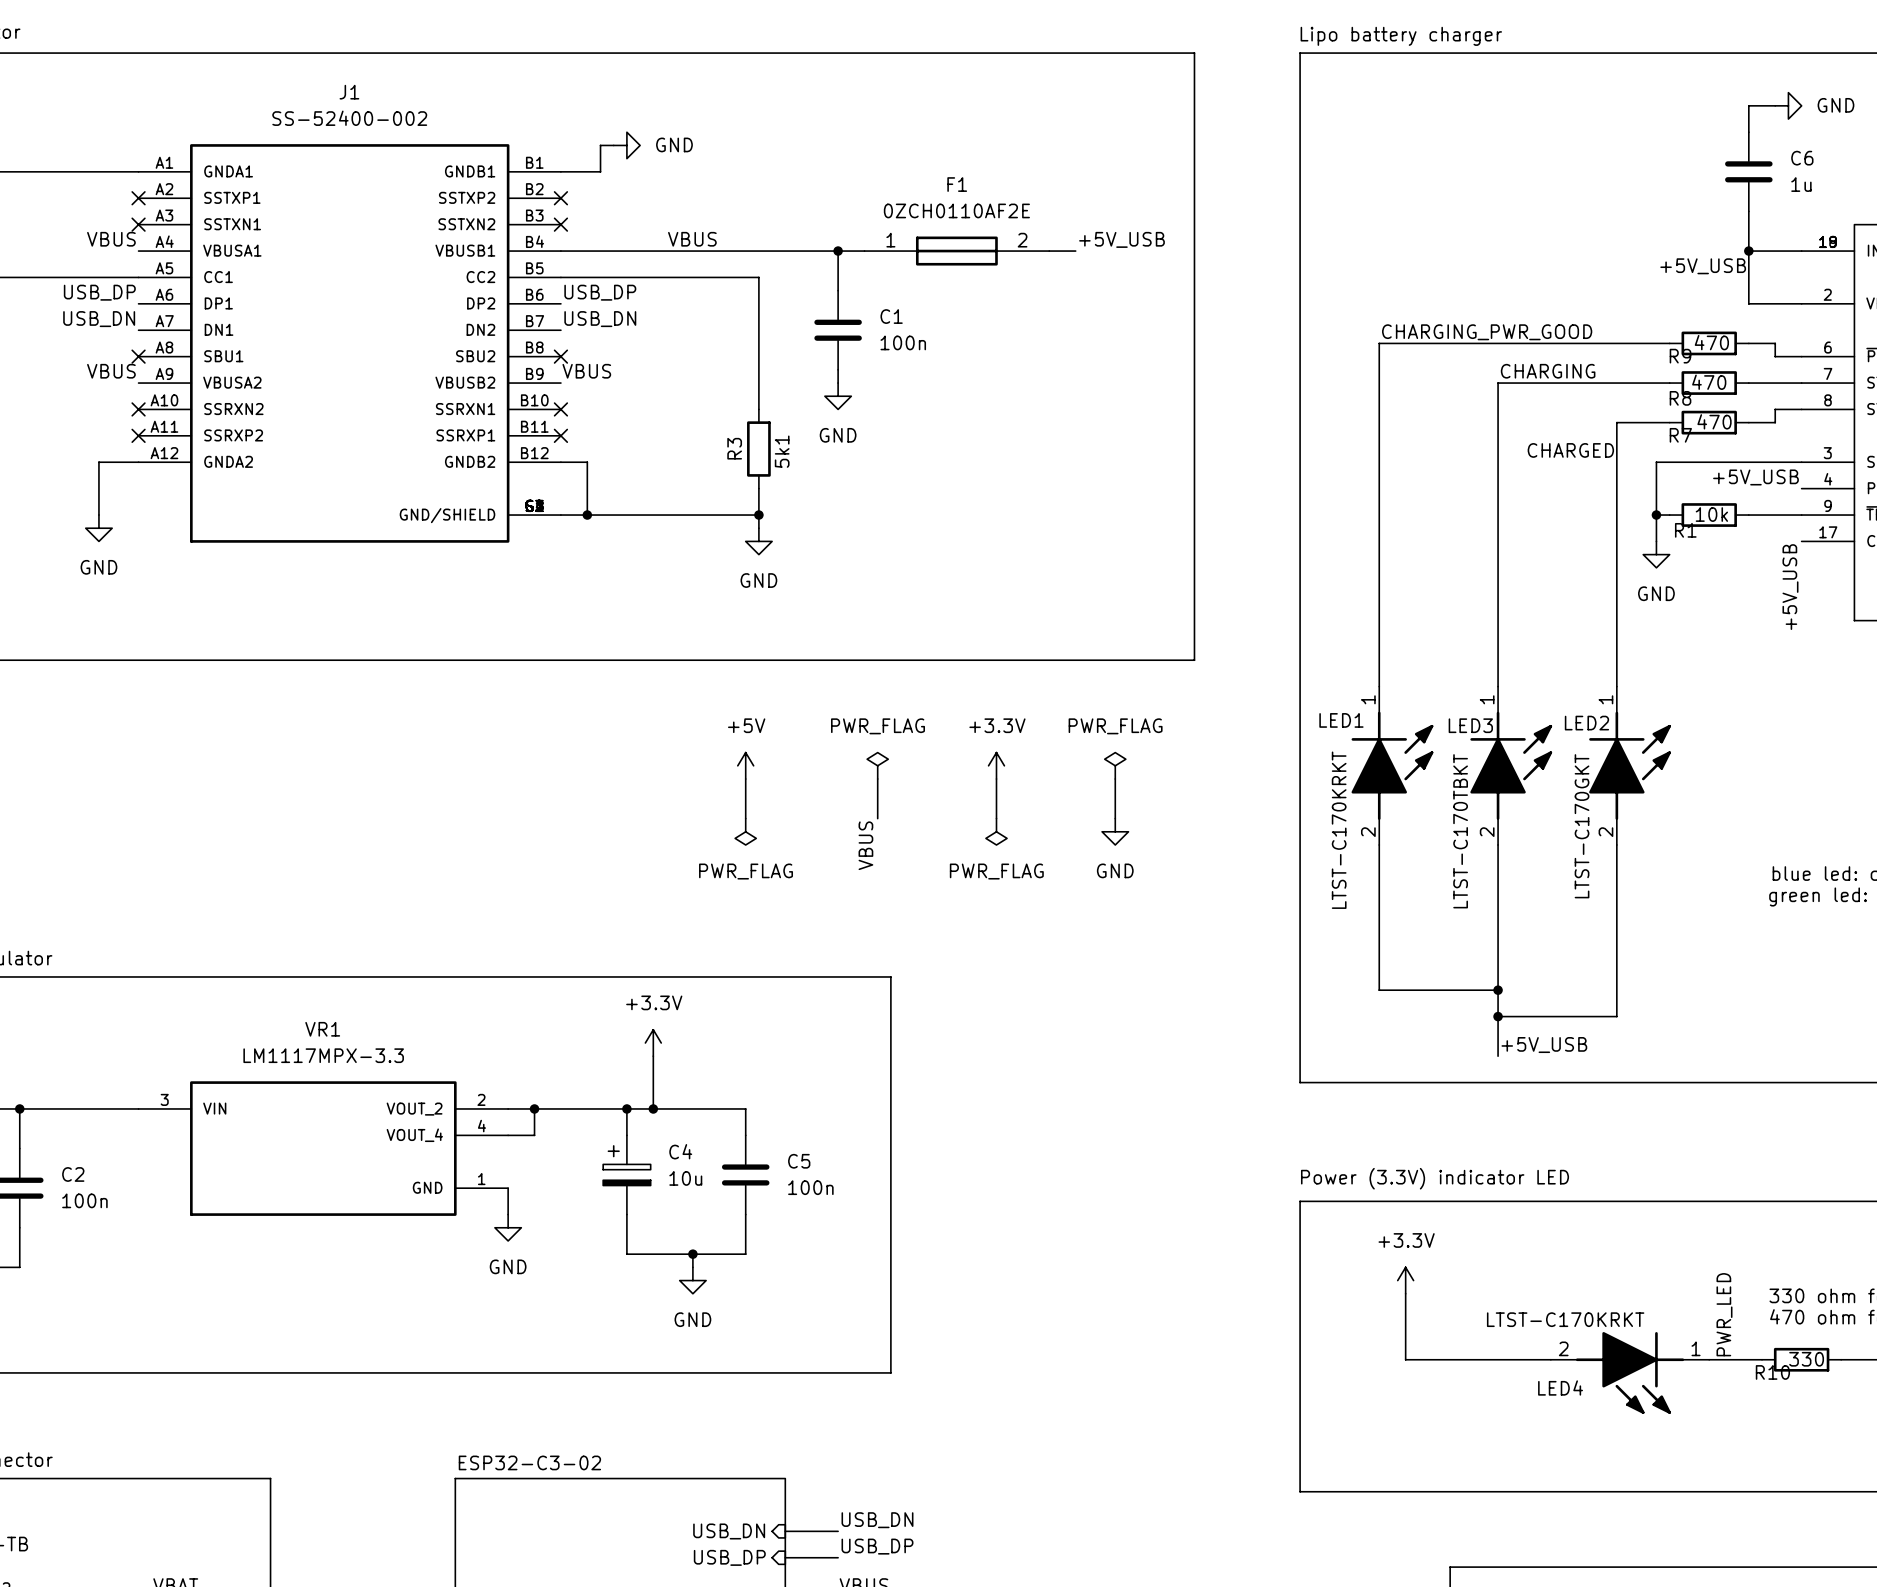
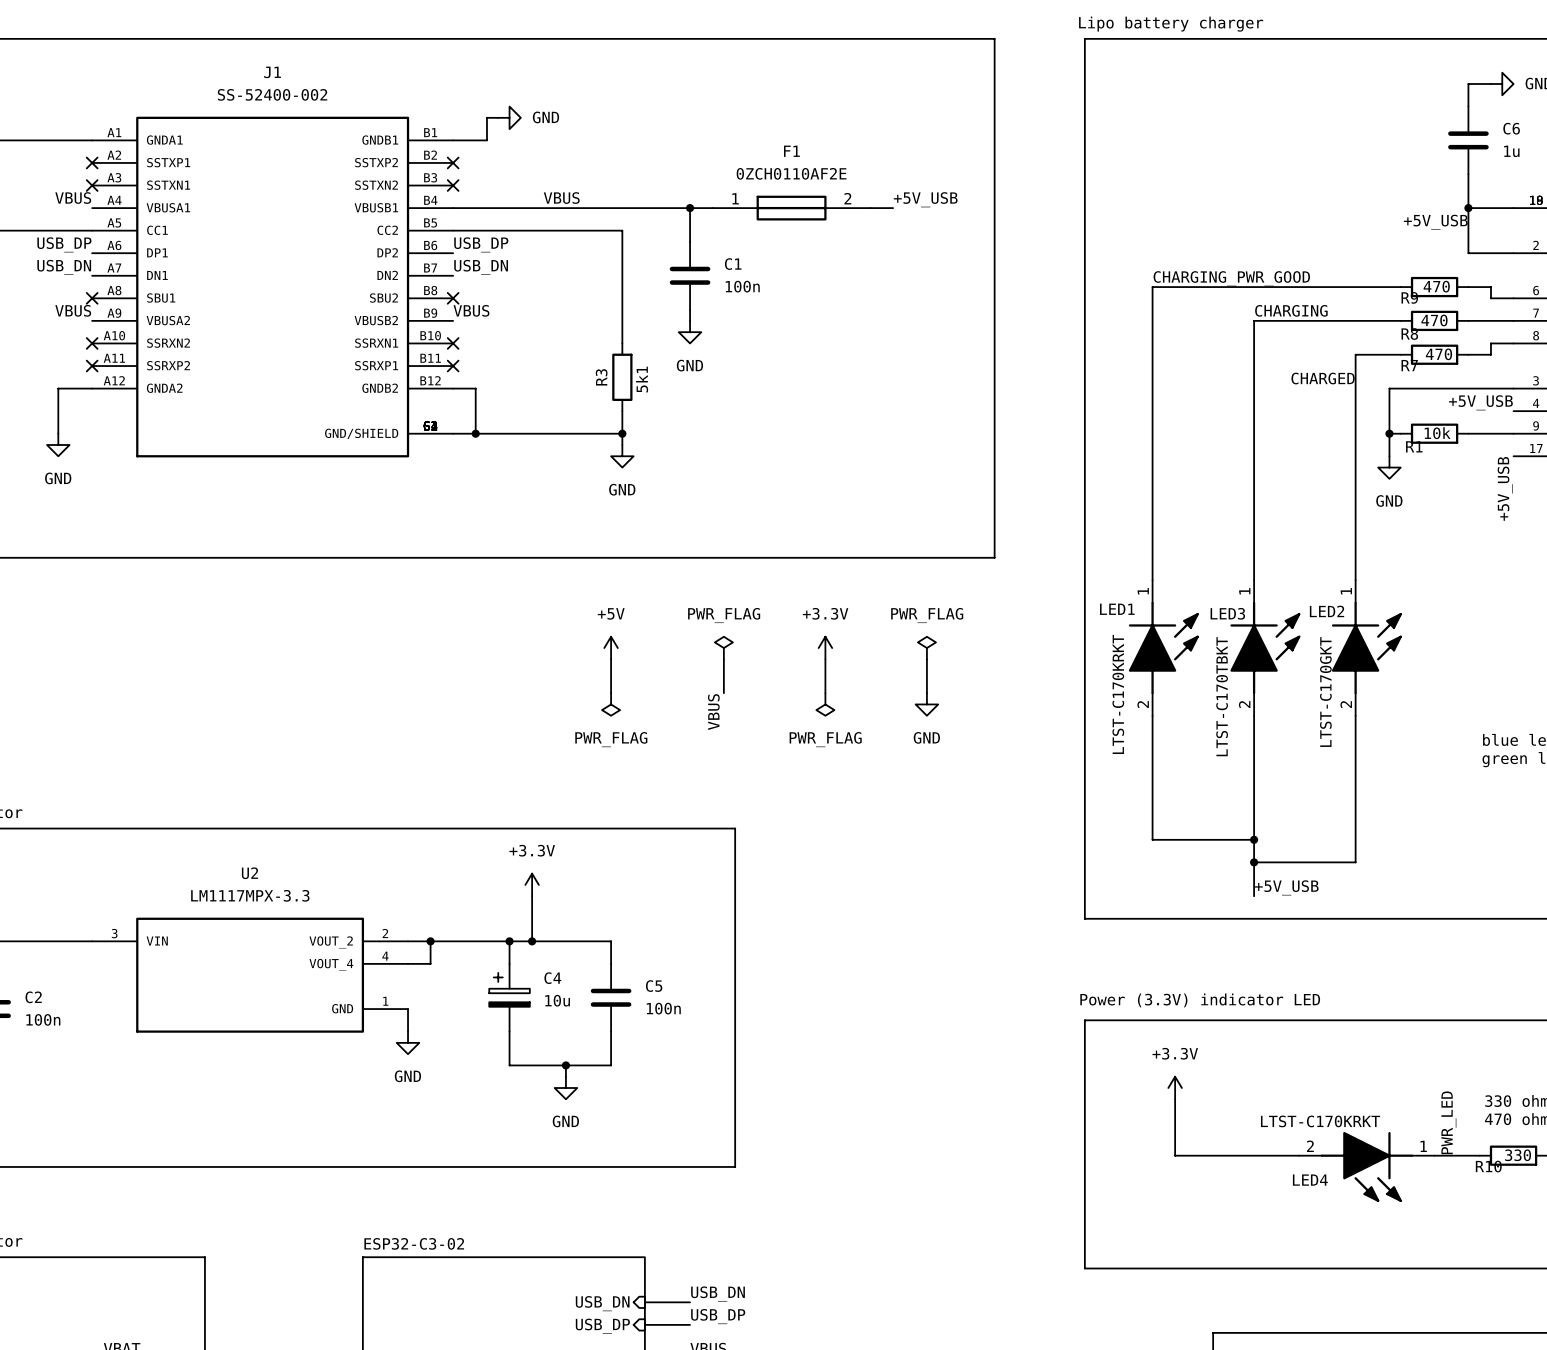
VR1 name: VR1 (322, 1029) -> U2 (249, 873)

